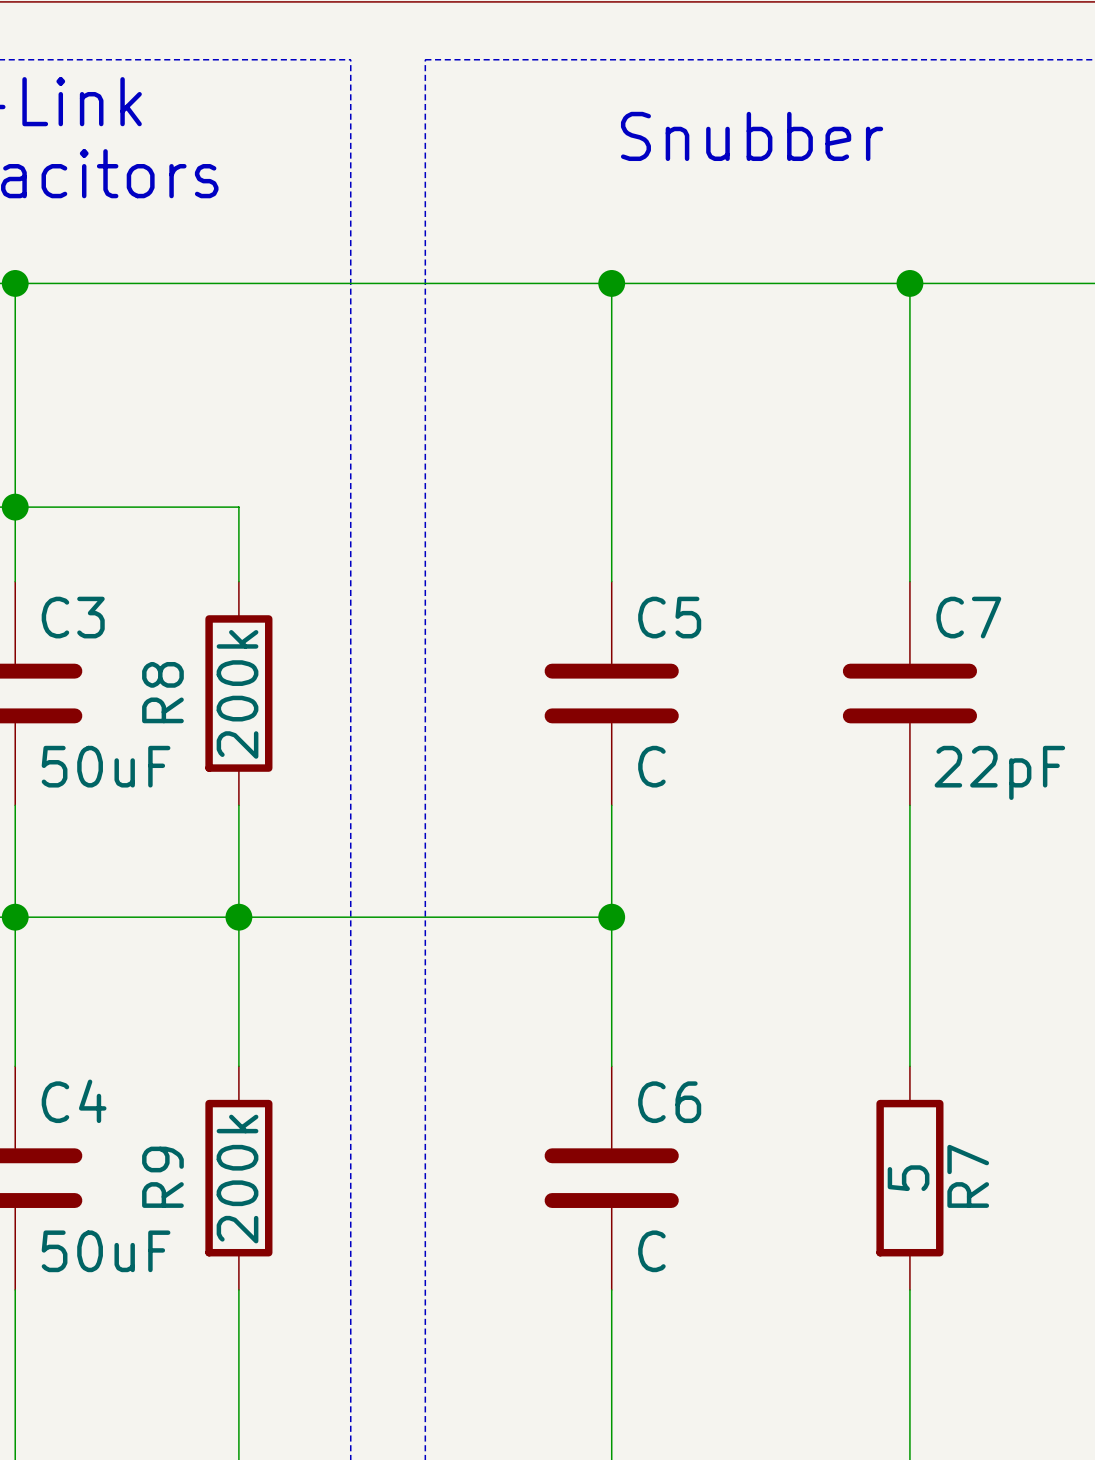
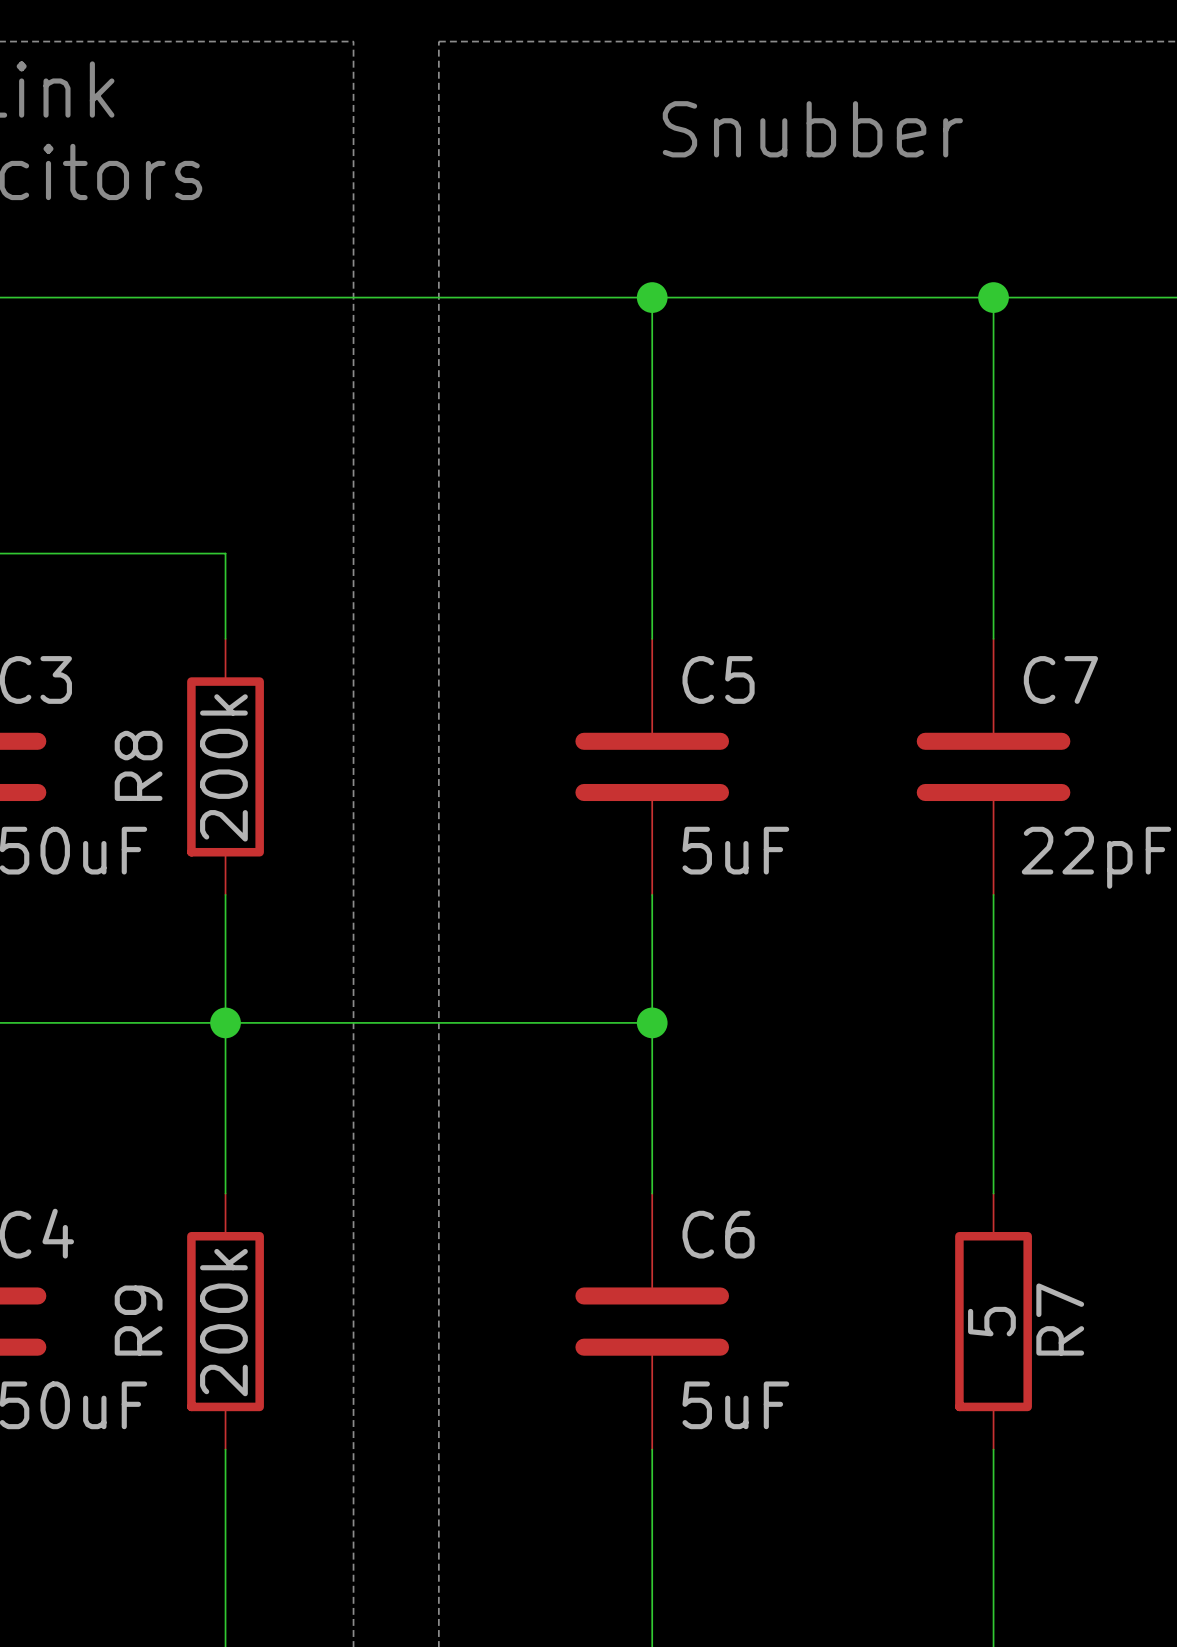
C5 value: C (651, 766) -> 5uF (735, 850)
C6 value: C (651, 1251) -> 5uF (735, 1405)

